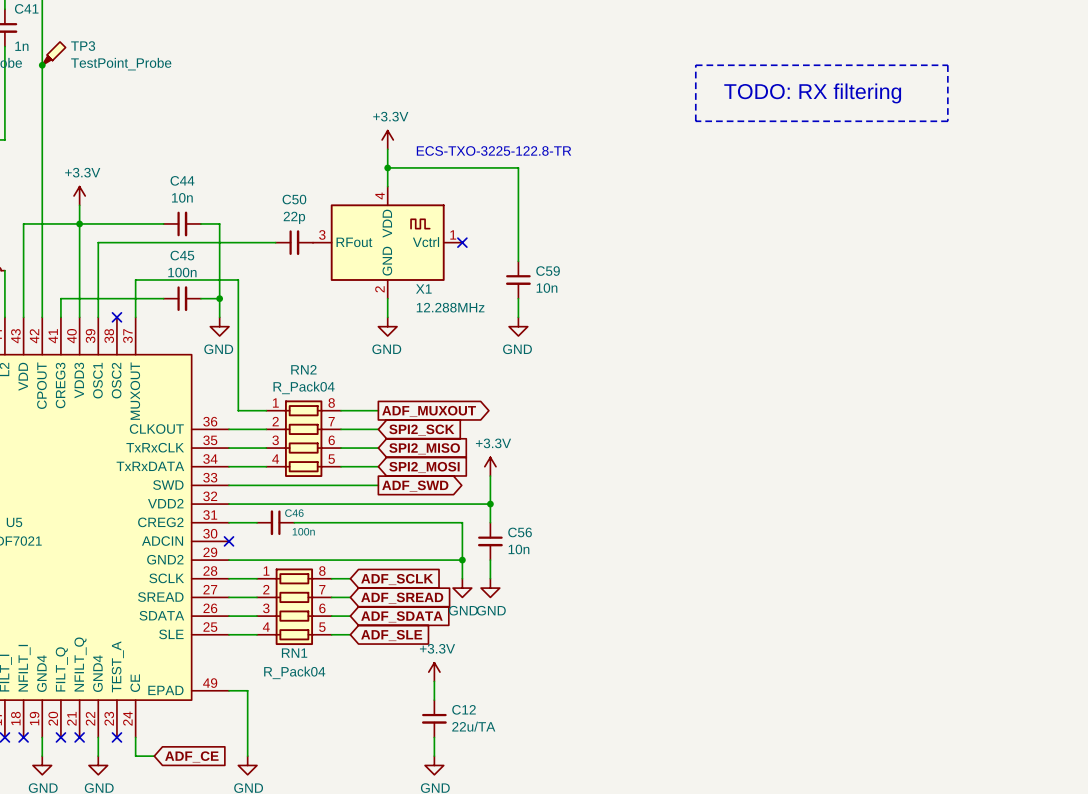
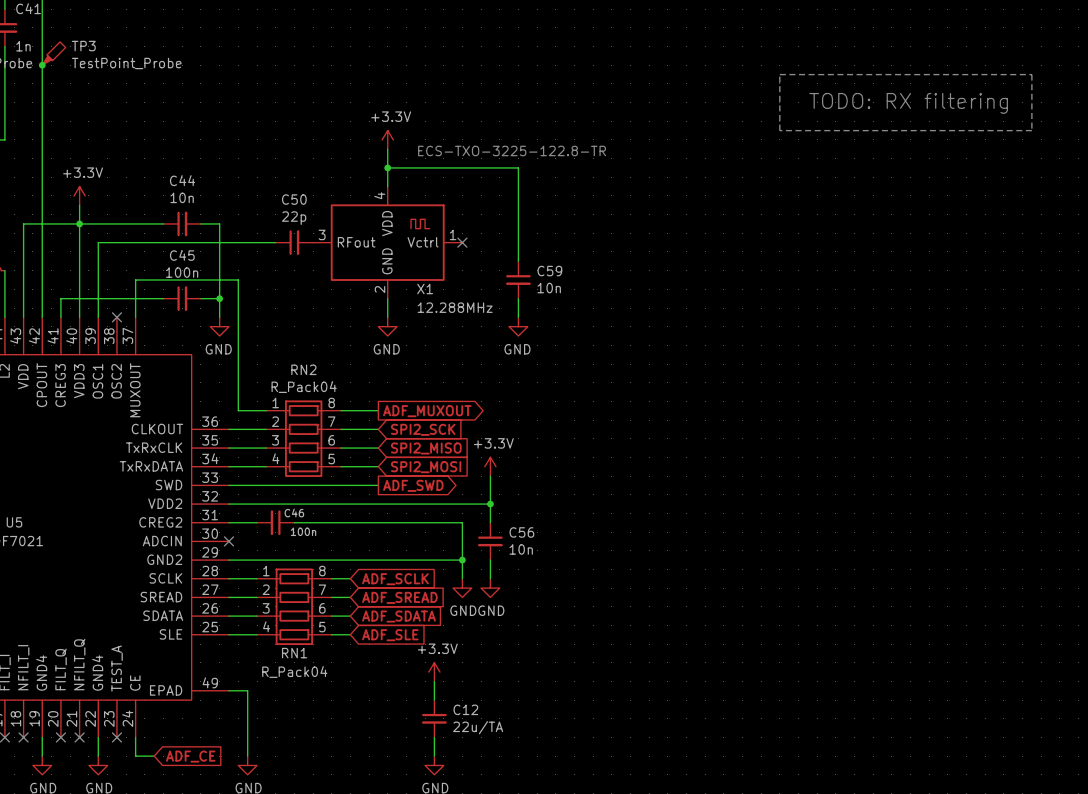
line: (695, 65) (947, 65) (947, 121) (695, 121) (695, 65) -> (779, 74) (1031, 74) (1031, 130) (779, 130) (779, 74)
text position: TODO: RX filtering (812, 93) -> TODO: RX filtering (908, 103)

